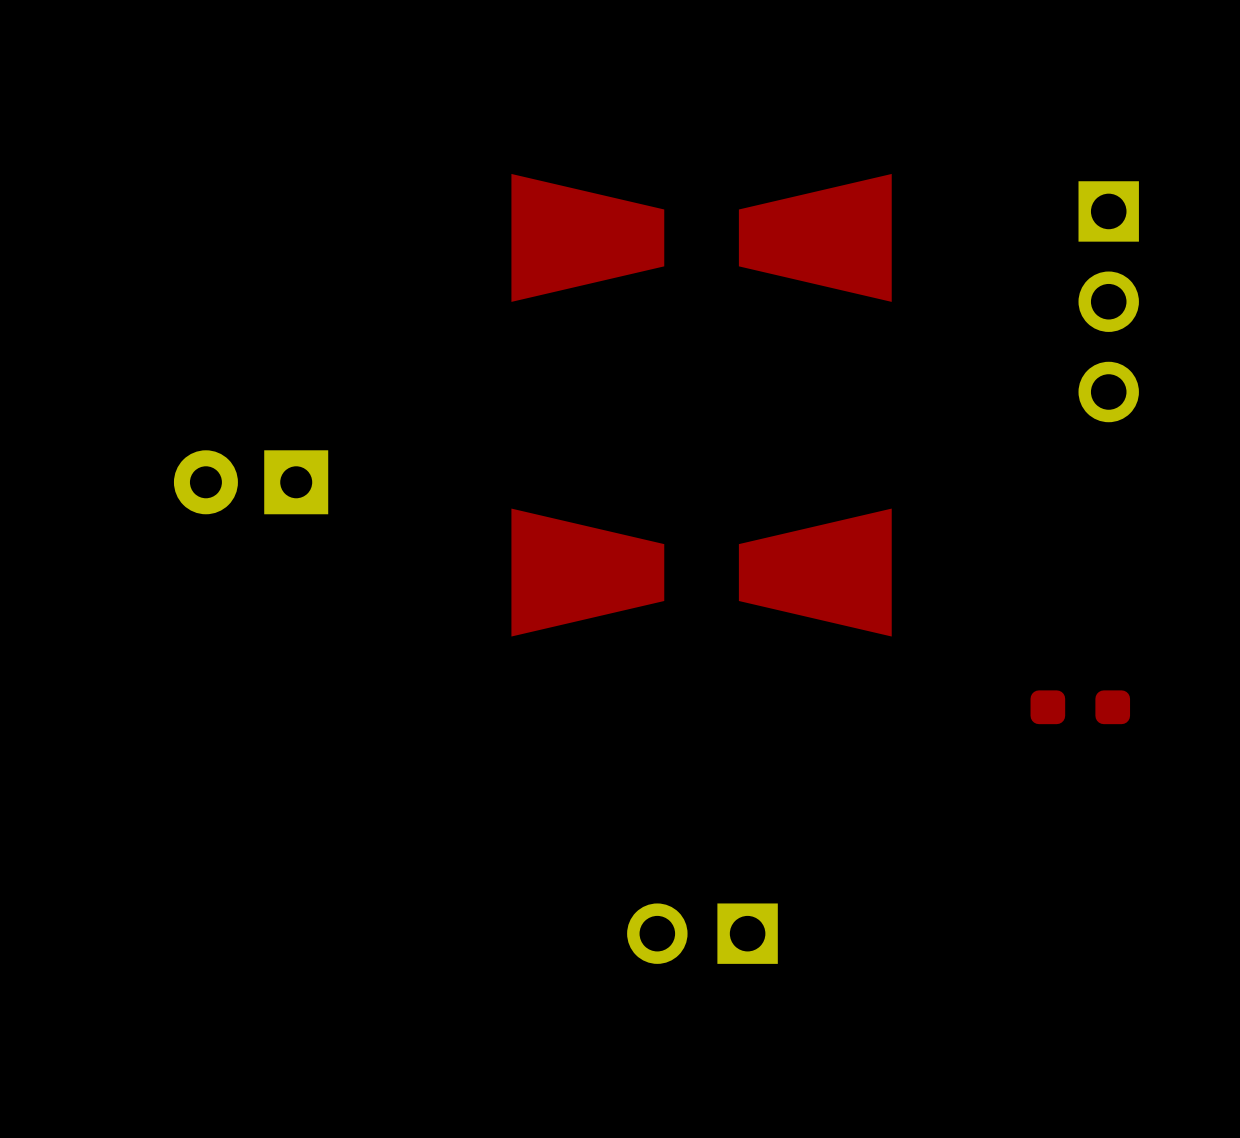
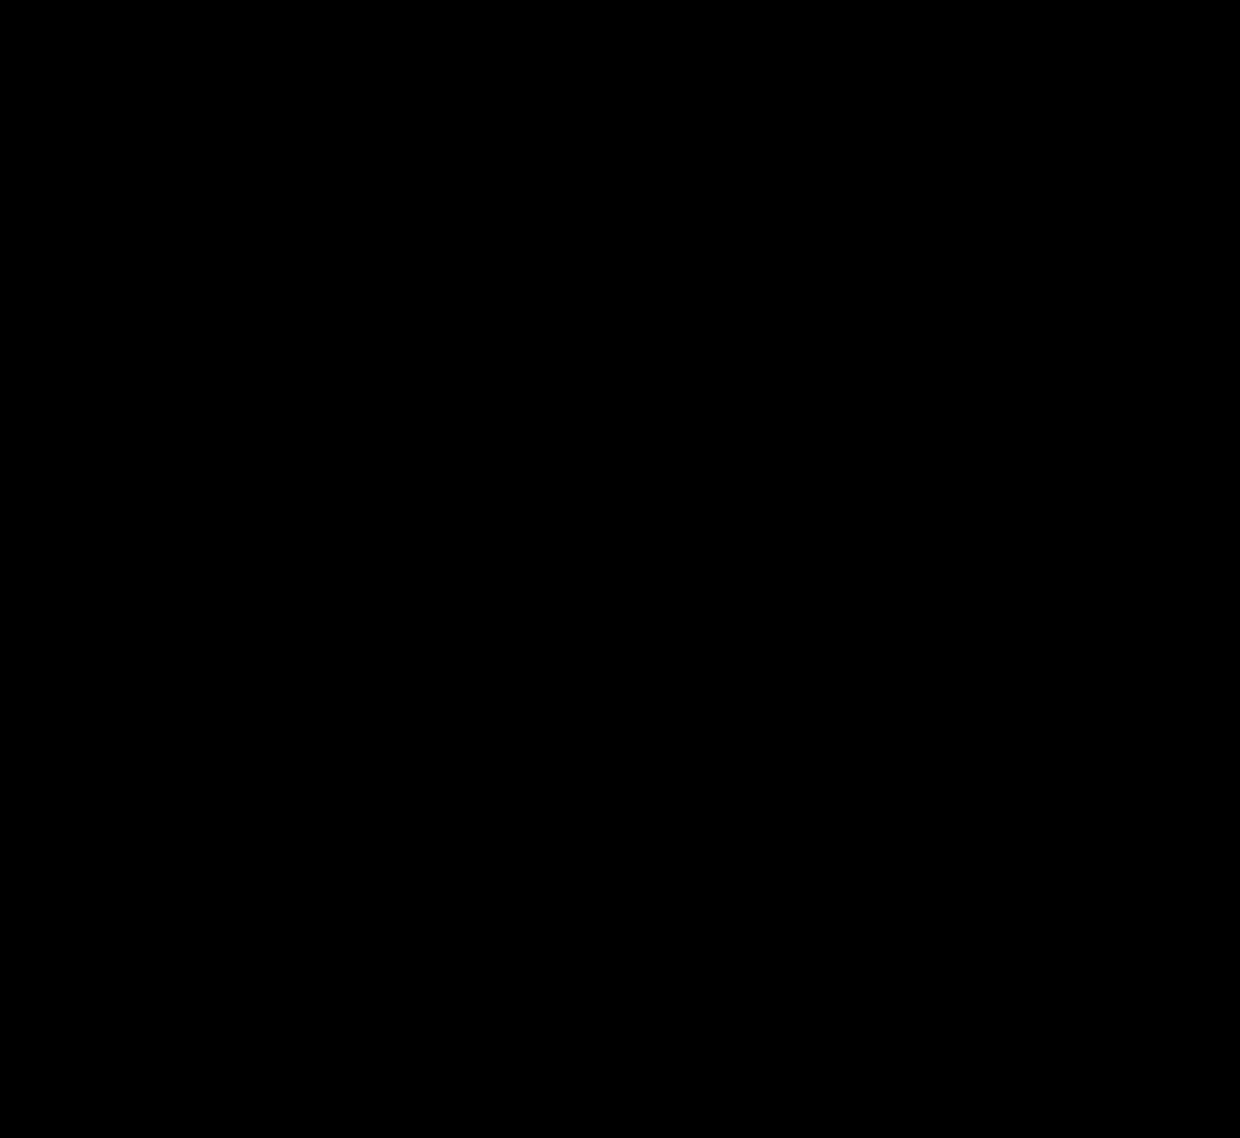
part: (701, 237) -> none
part: (1108, 301) -> none
part: (251, 482) -> none
part: (701, 572) -> none
part: (1080, 707) -> none
part: (702, 933) -> none

